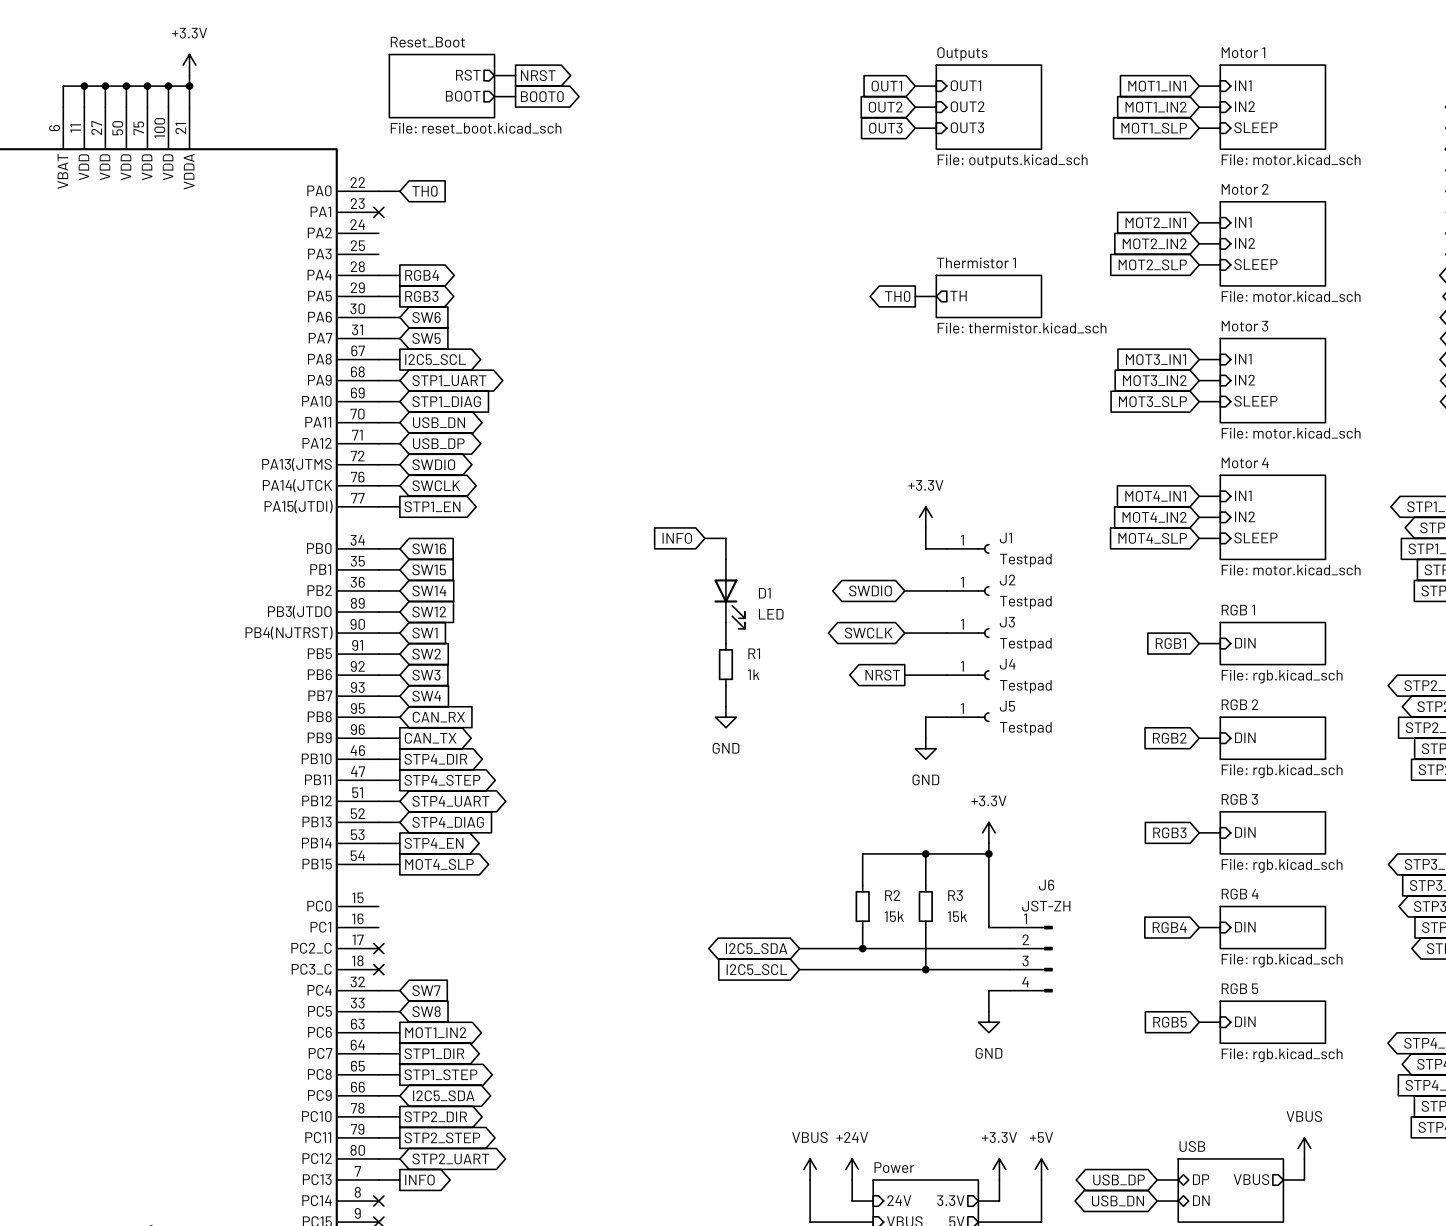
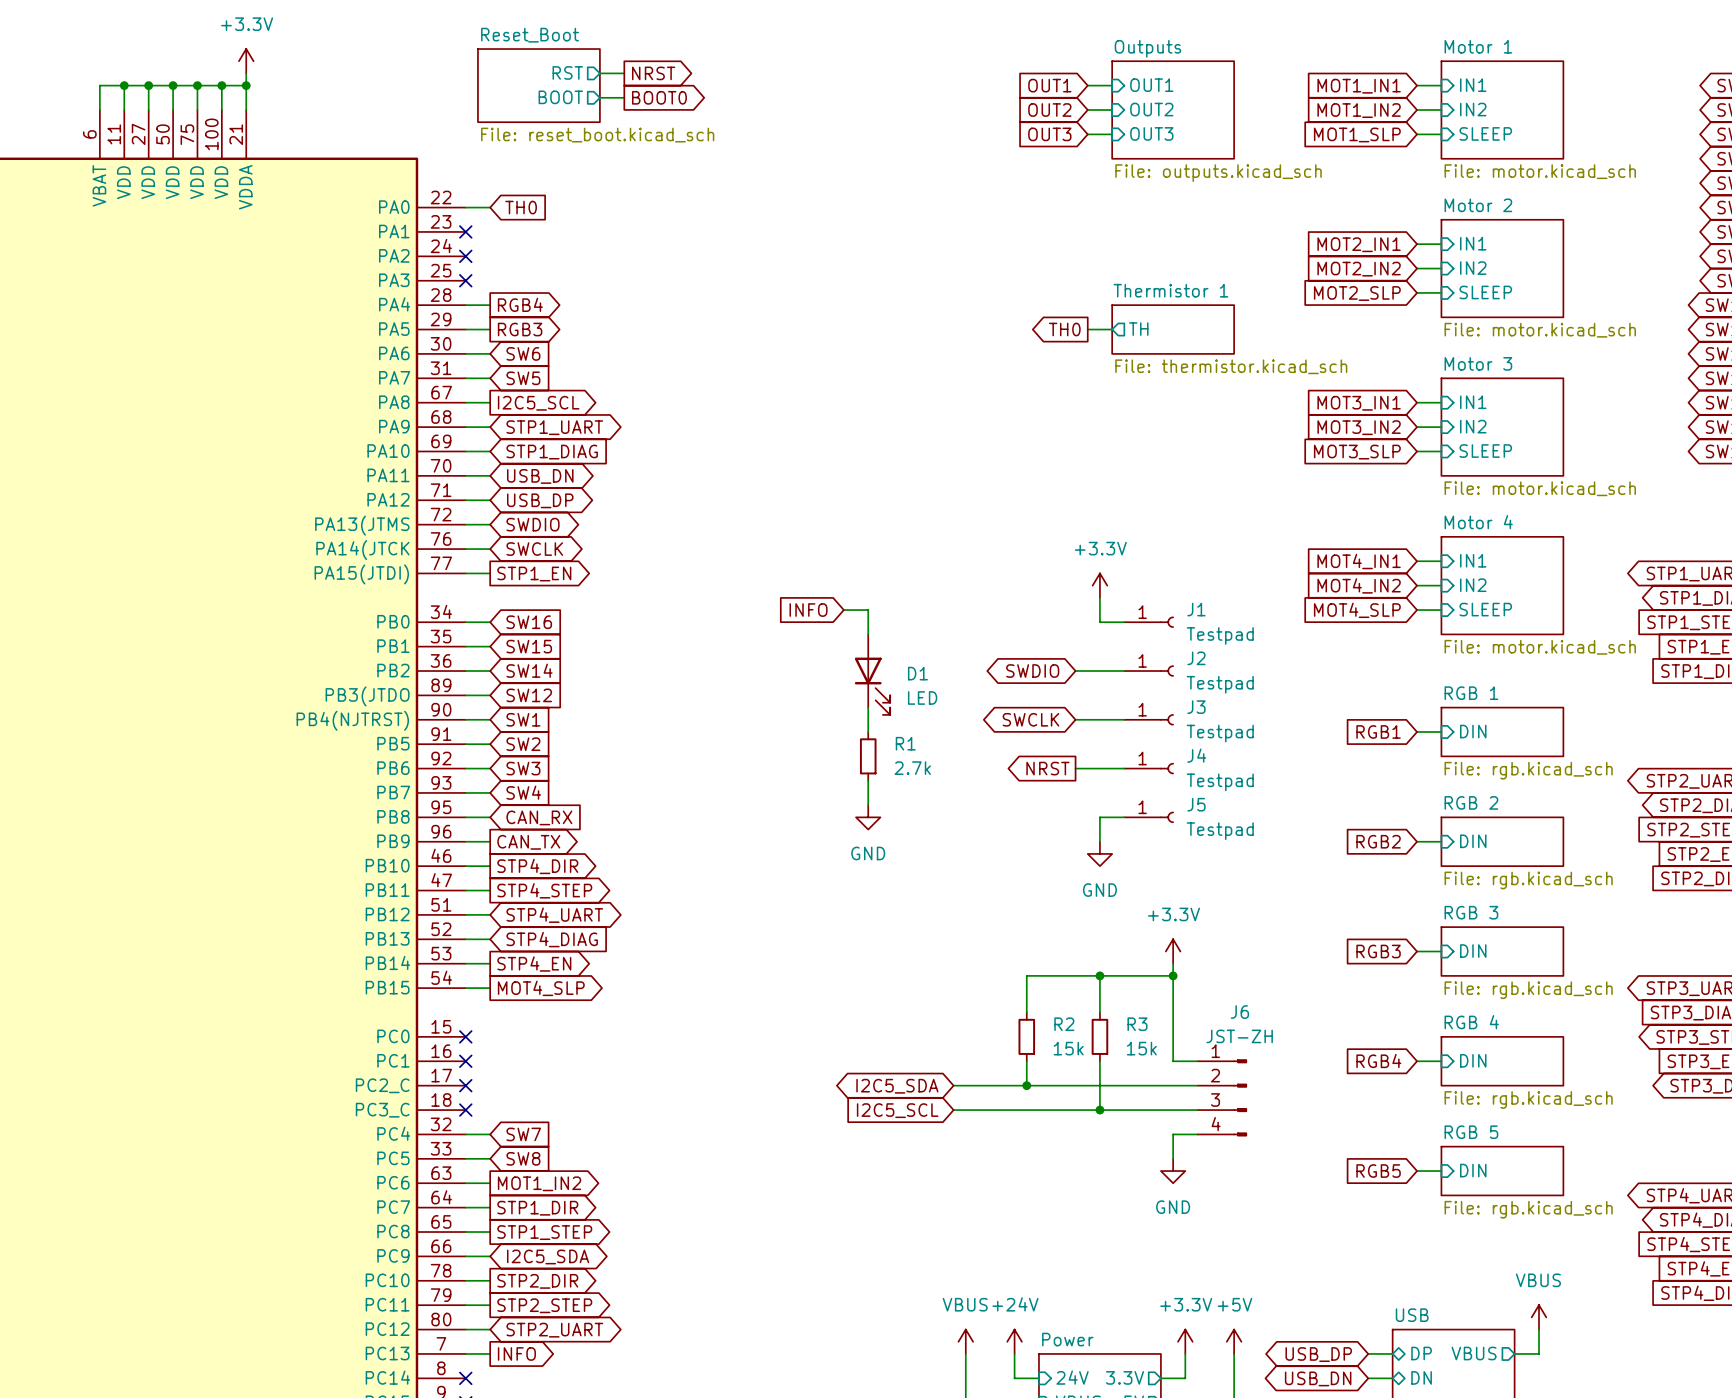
no-connect mark: none -> (465, 256)
no-connect mark: none -> (465, 280)
R1 value: 1k (753, 674) -> 2.7k (912, 768)
no-connect mark: none -> (465, 1036)
no-connect mark: none -> (465, 1061)

